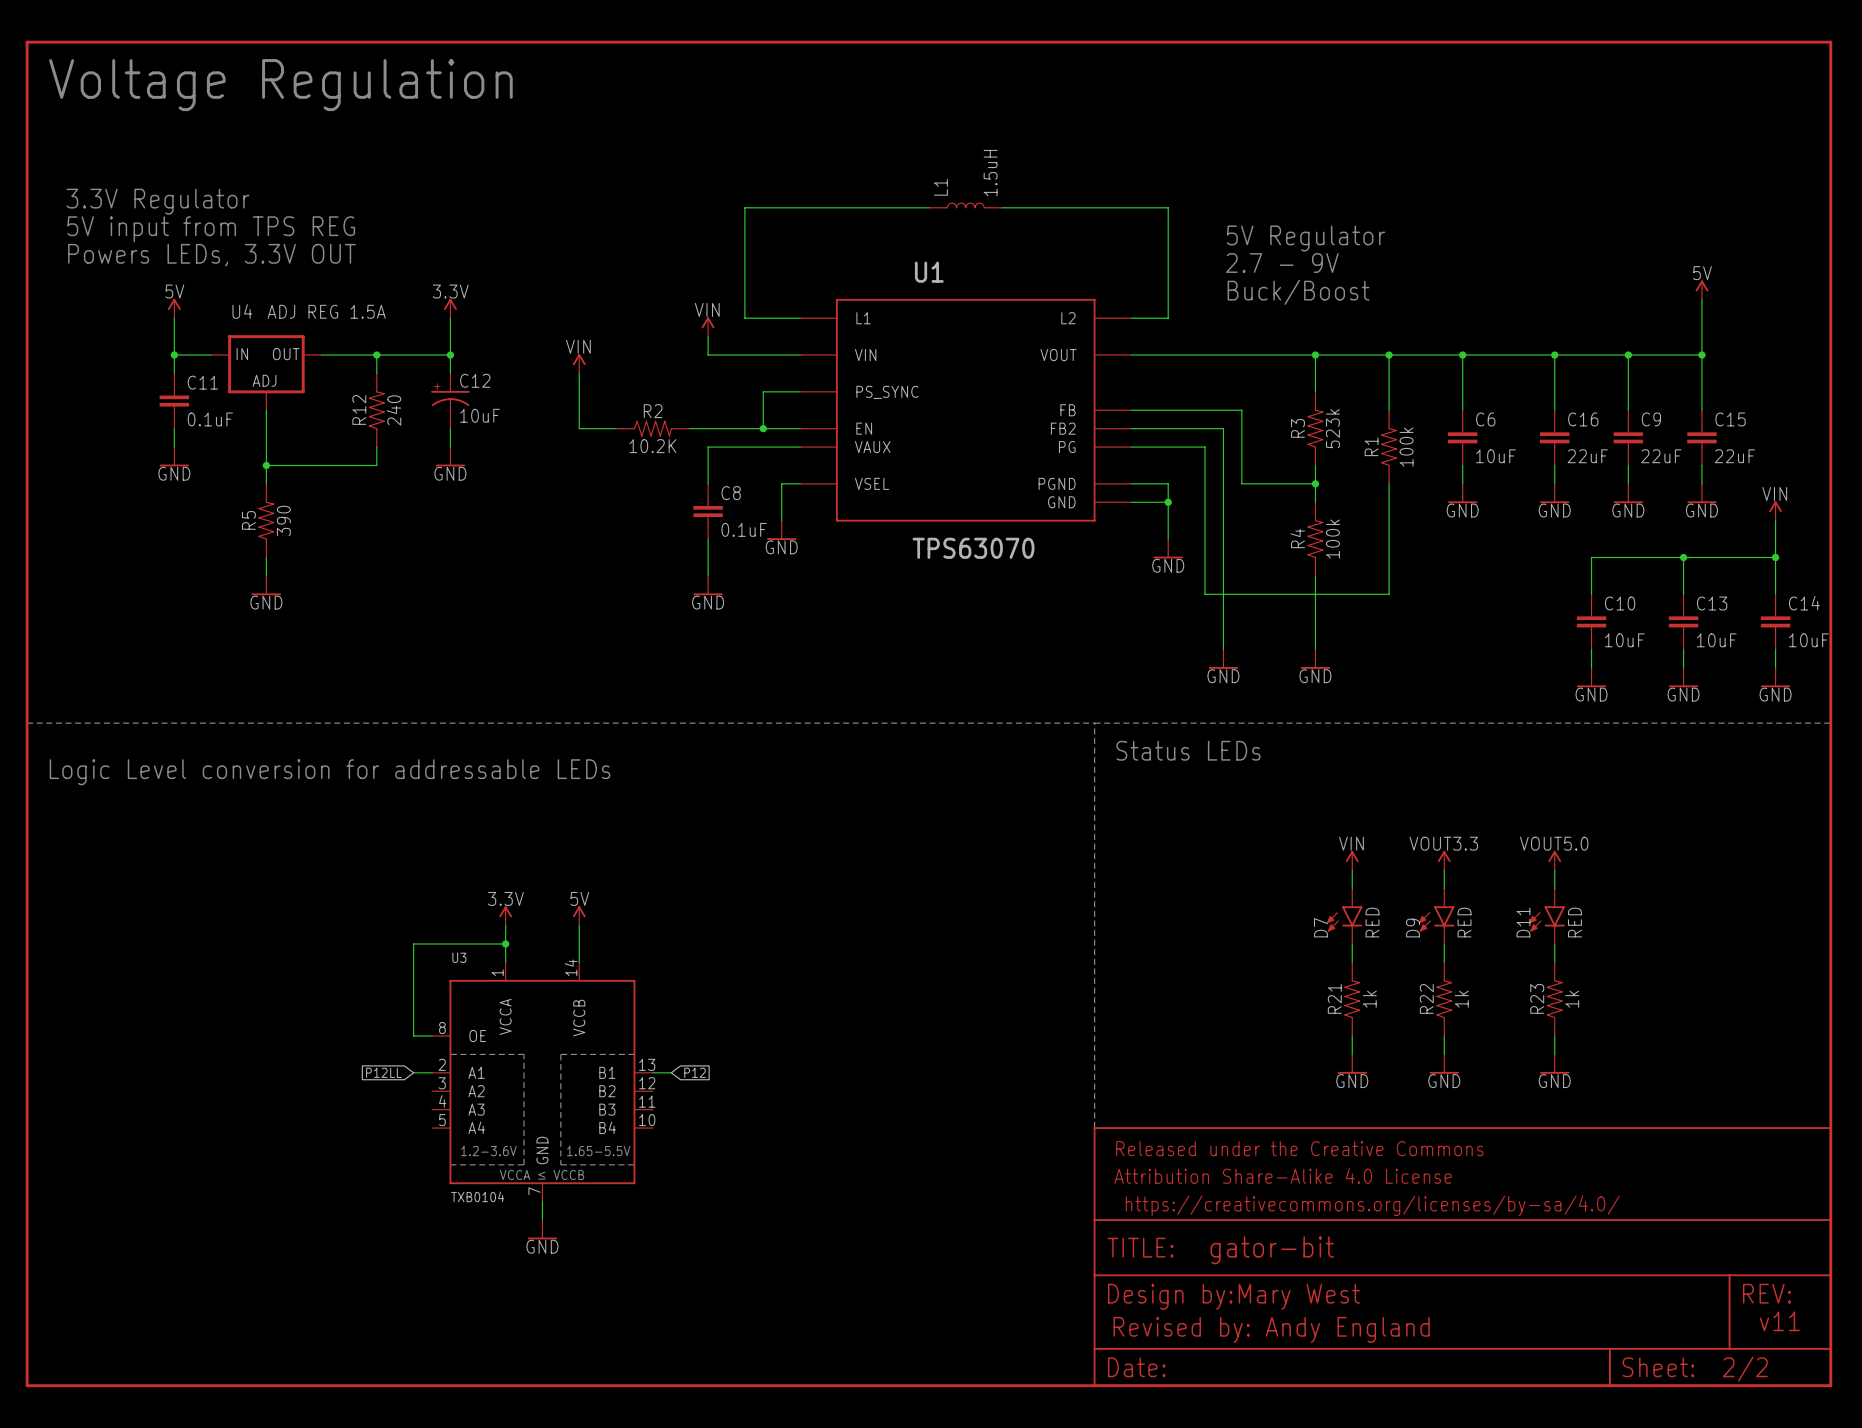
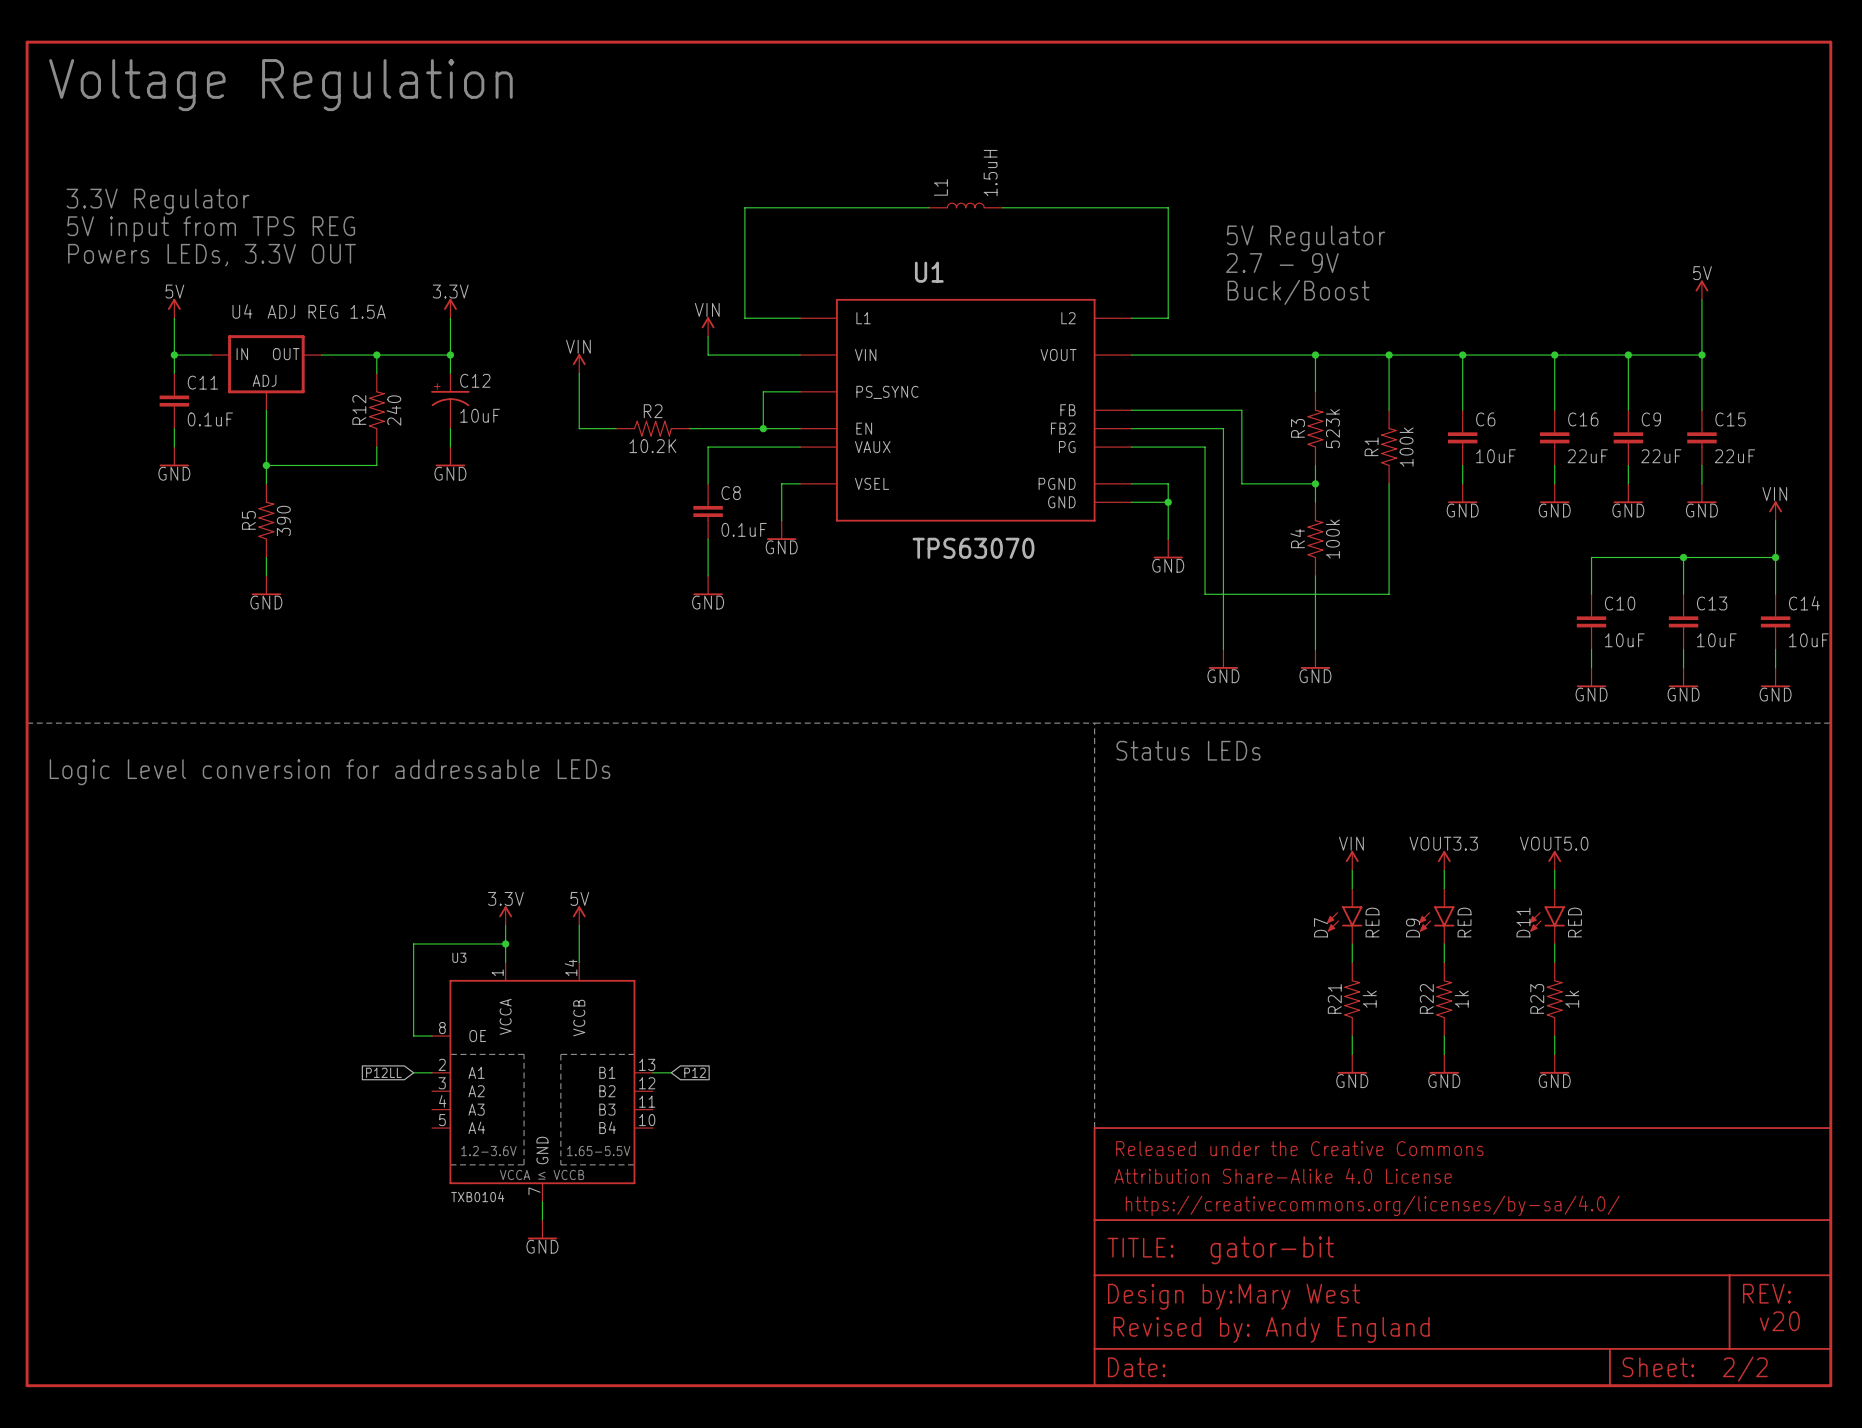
text: v11 (1779, 1321) -> v20 (1779, 1321)

